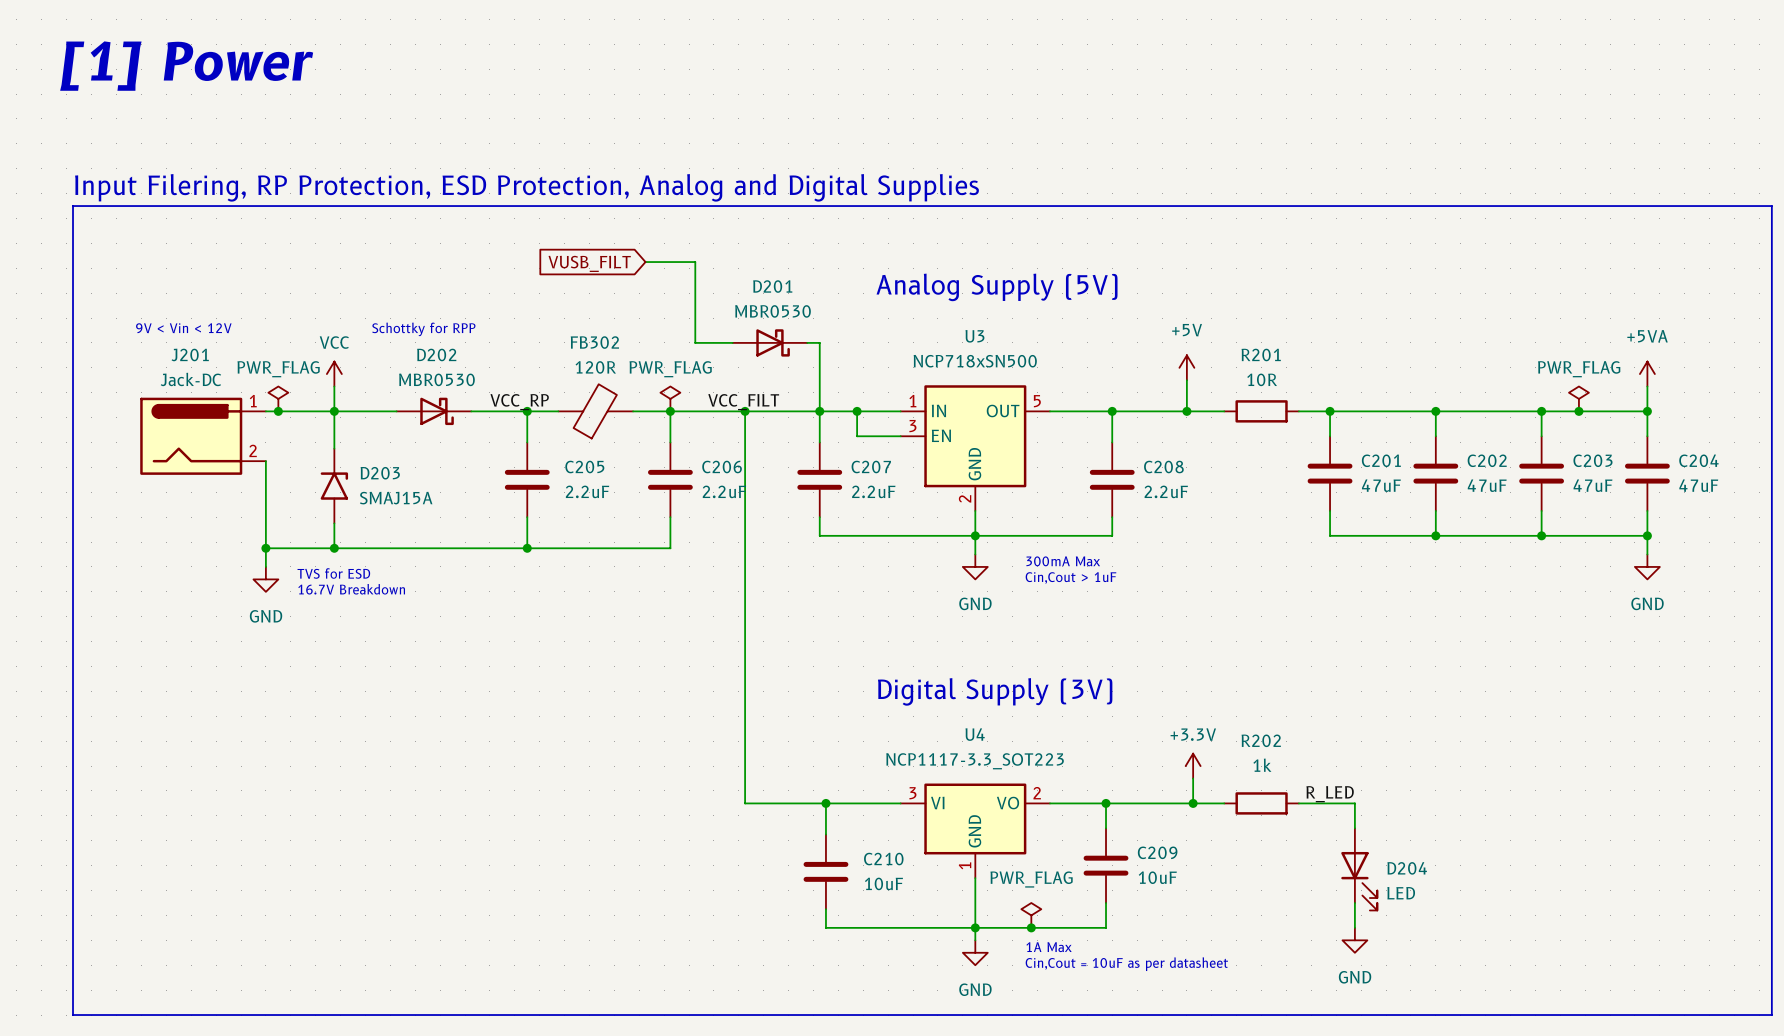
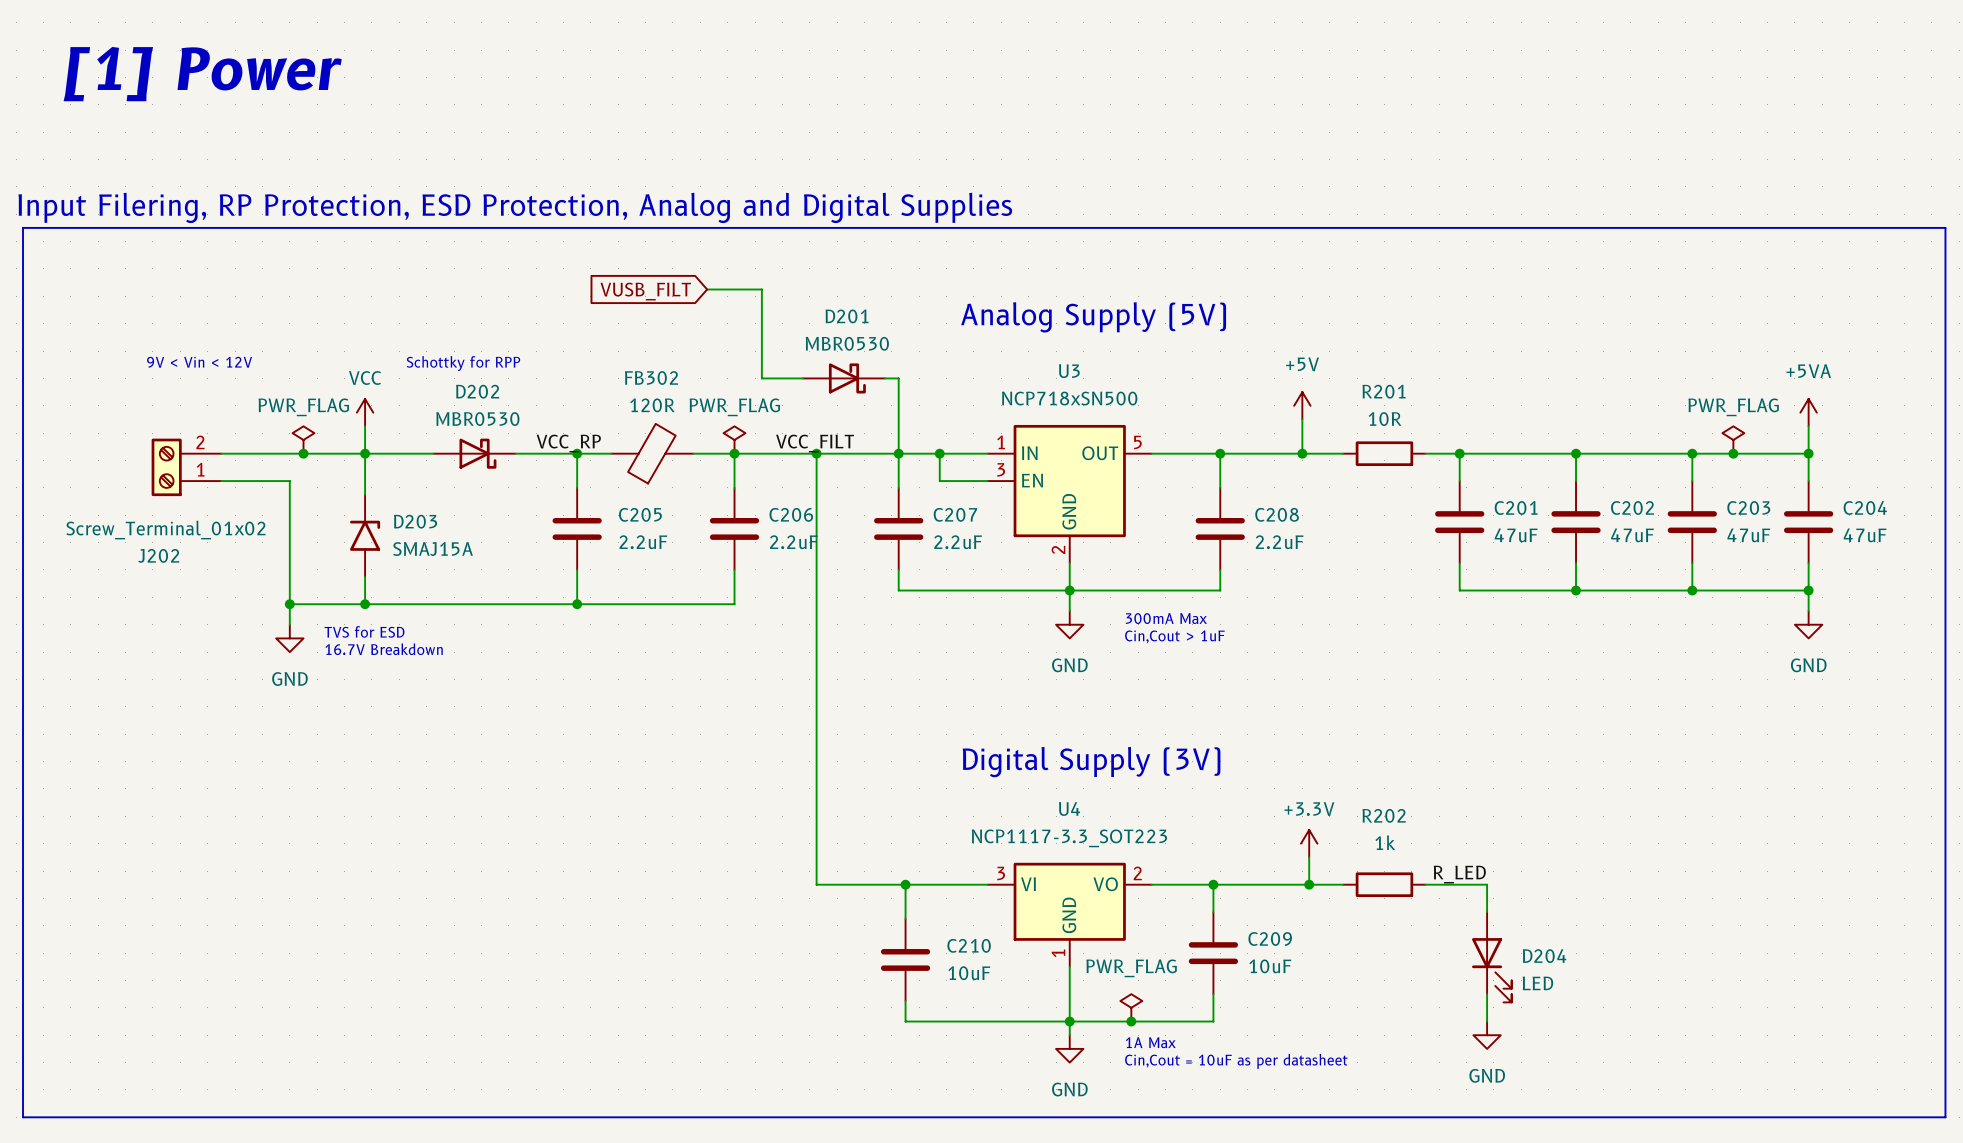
text position: Input Filering, RP Protection, ESD Protection, Analog and Digital Supplies (526, 187) -> Input Filering, RP Protection, ESD Protection, Analog and Digital Supplies (515, 207)
line: (73, 206) (73, 1015) -> (77, 227) (23, 227) (23, 1117) (77, 1117)
J202: none -> Screw_Terminal_01x02 (186, 467)
wire: none -> (221, 481) (289, 481) (289, 508)
J201: Jack-DC (203, 436) -> none

